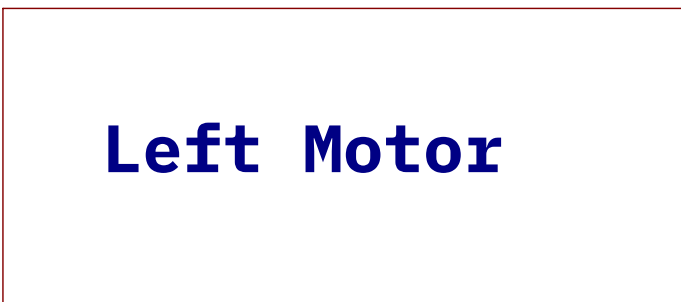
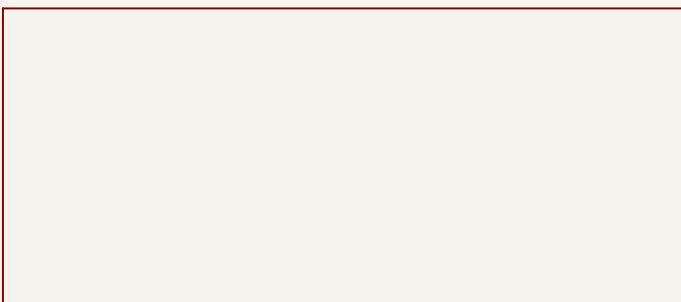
text: Left Motor (304, 147) -> none

